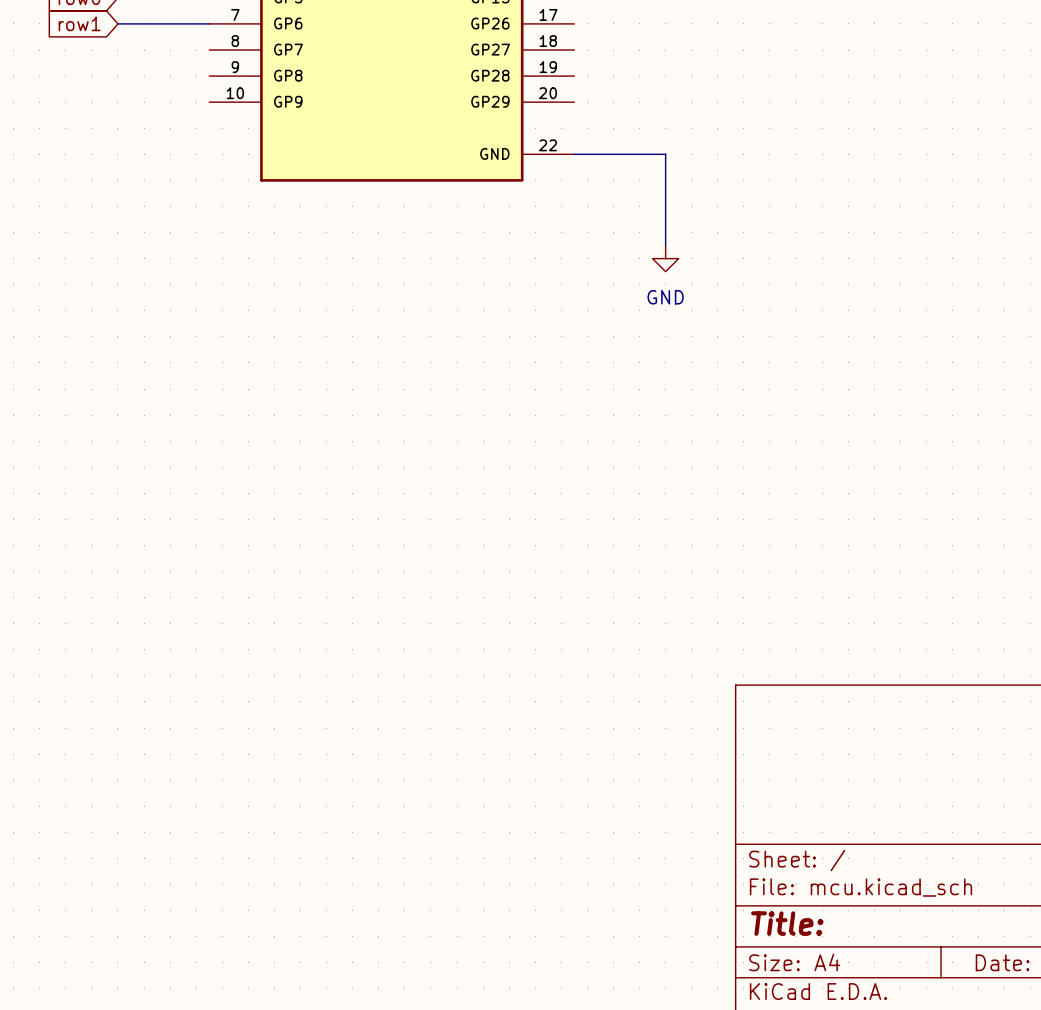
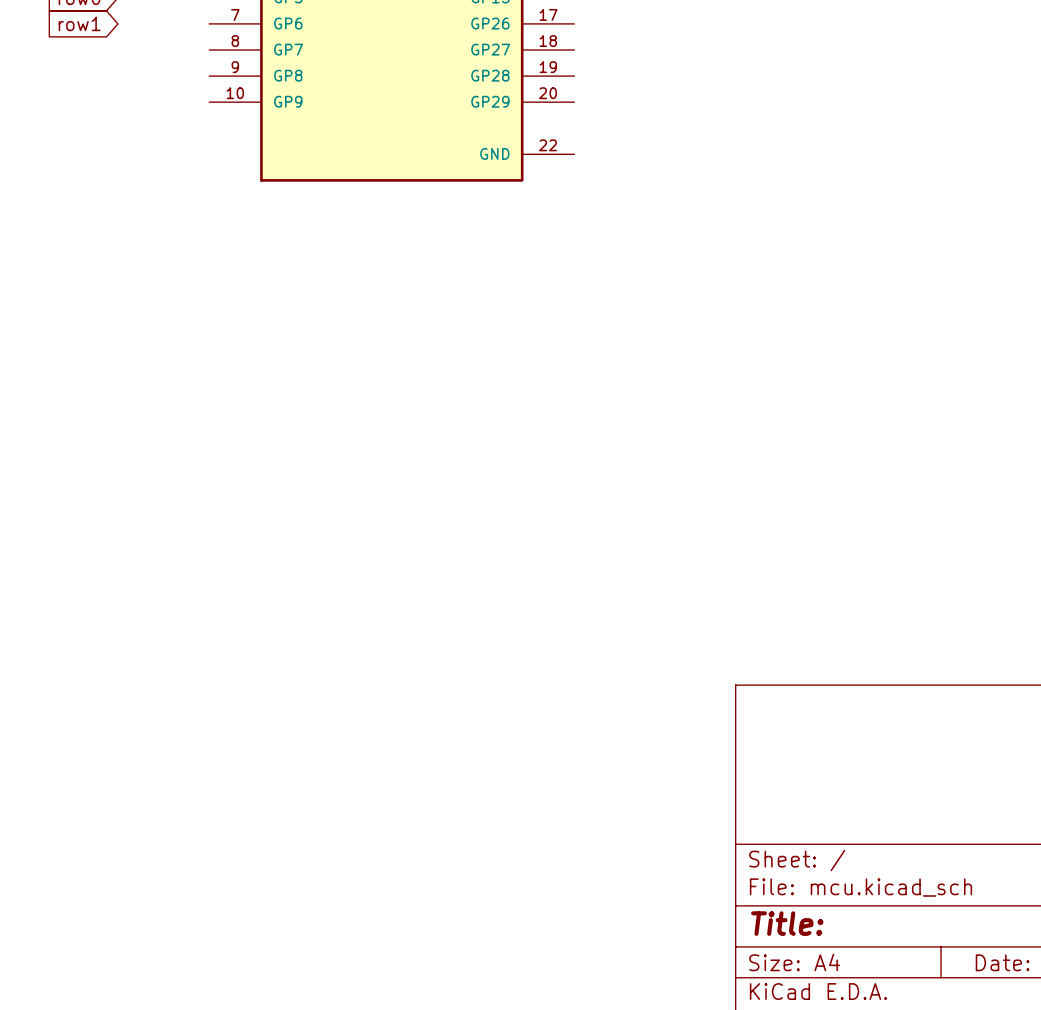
wire: (117, 23) (209, 23) -> none
wire: (574, 154) (665, 154) (665, 245) -> none
power symbol: GND (665, 258) -> none

